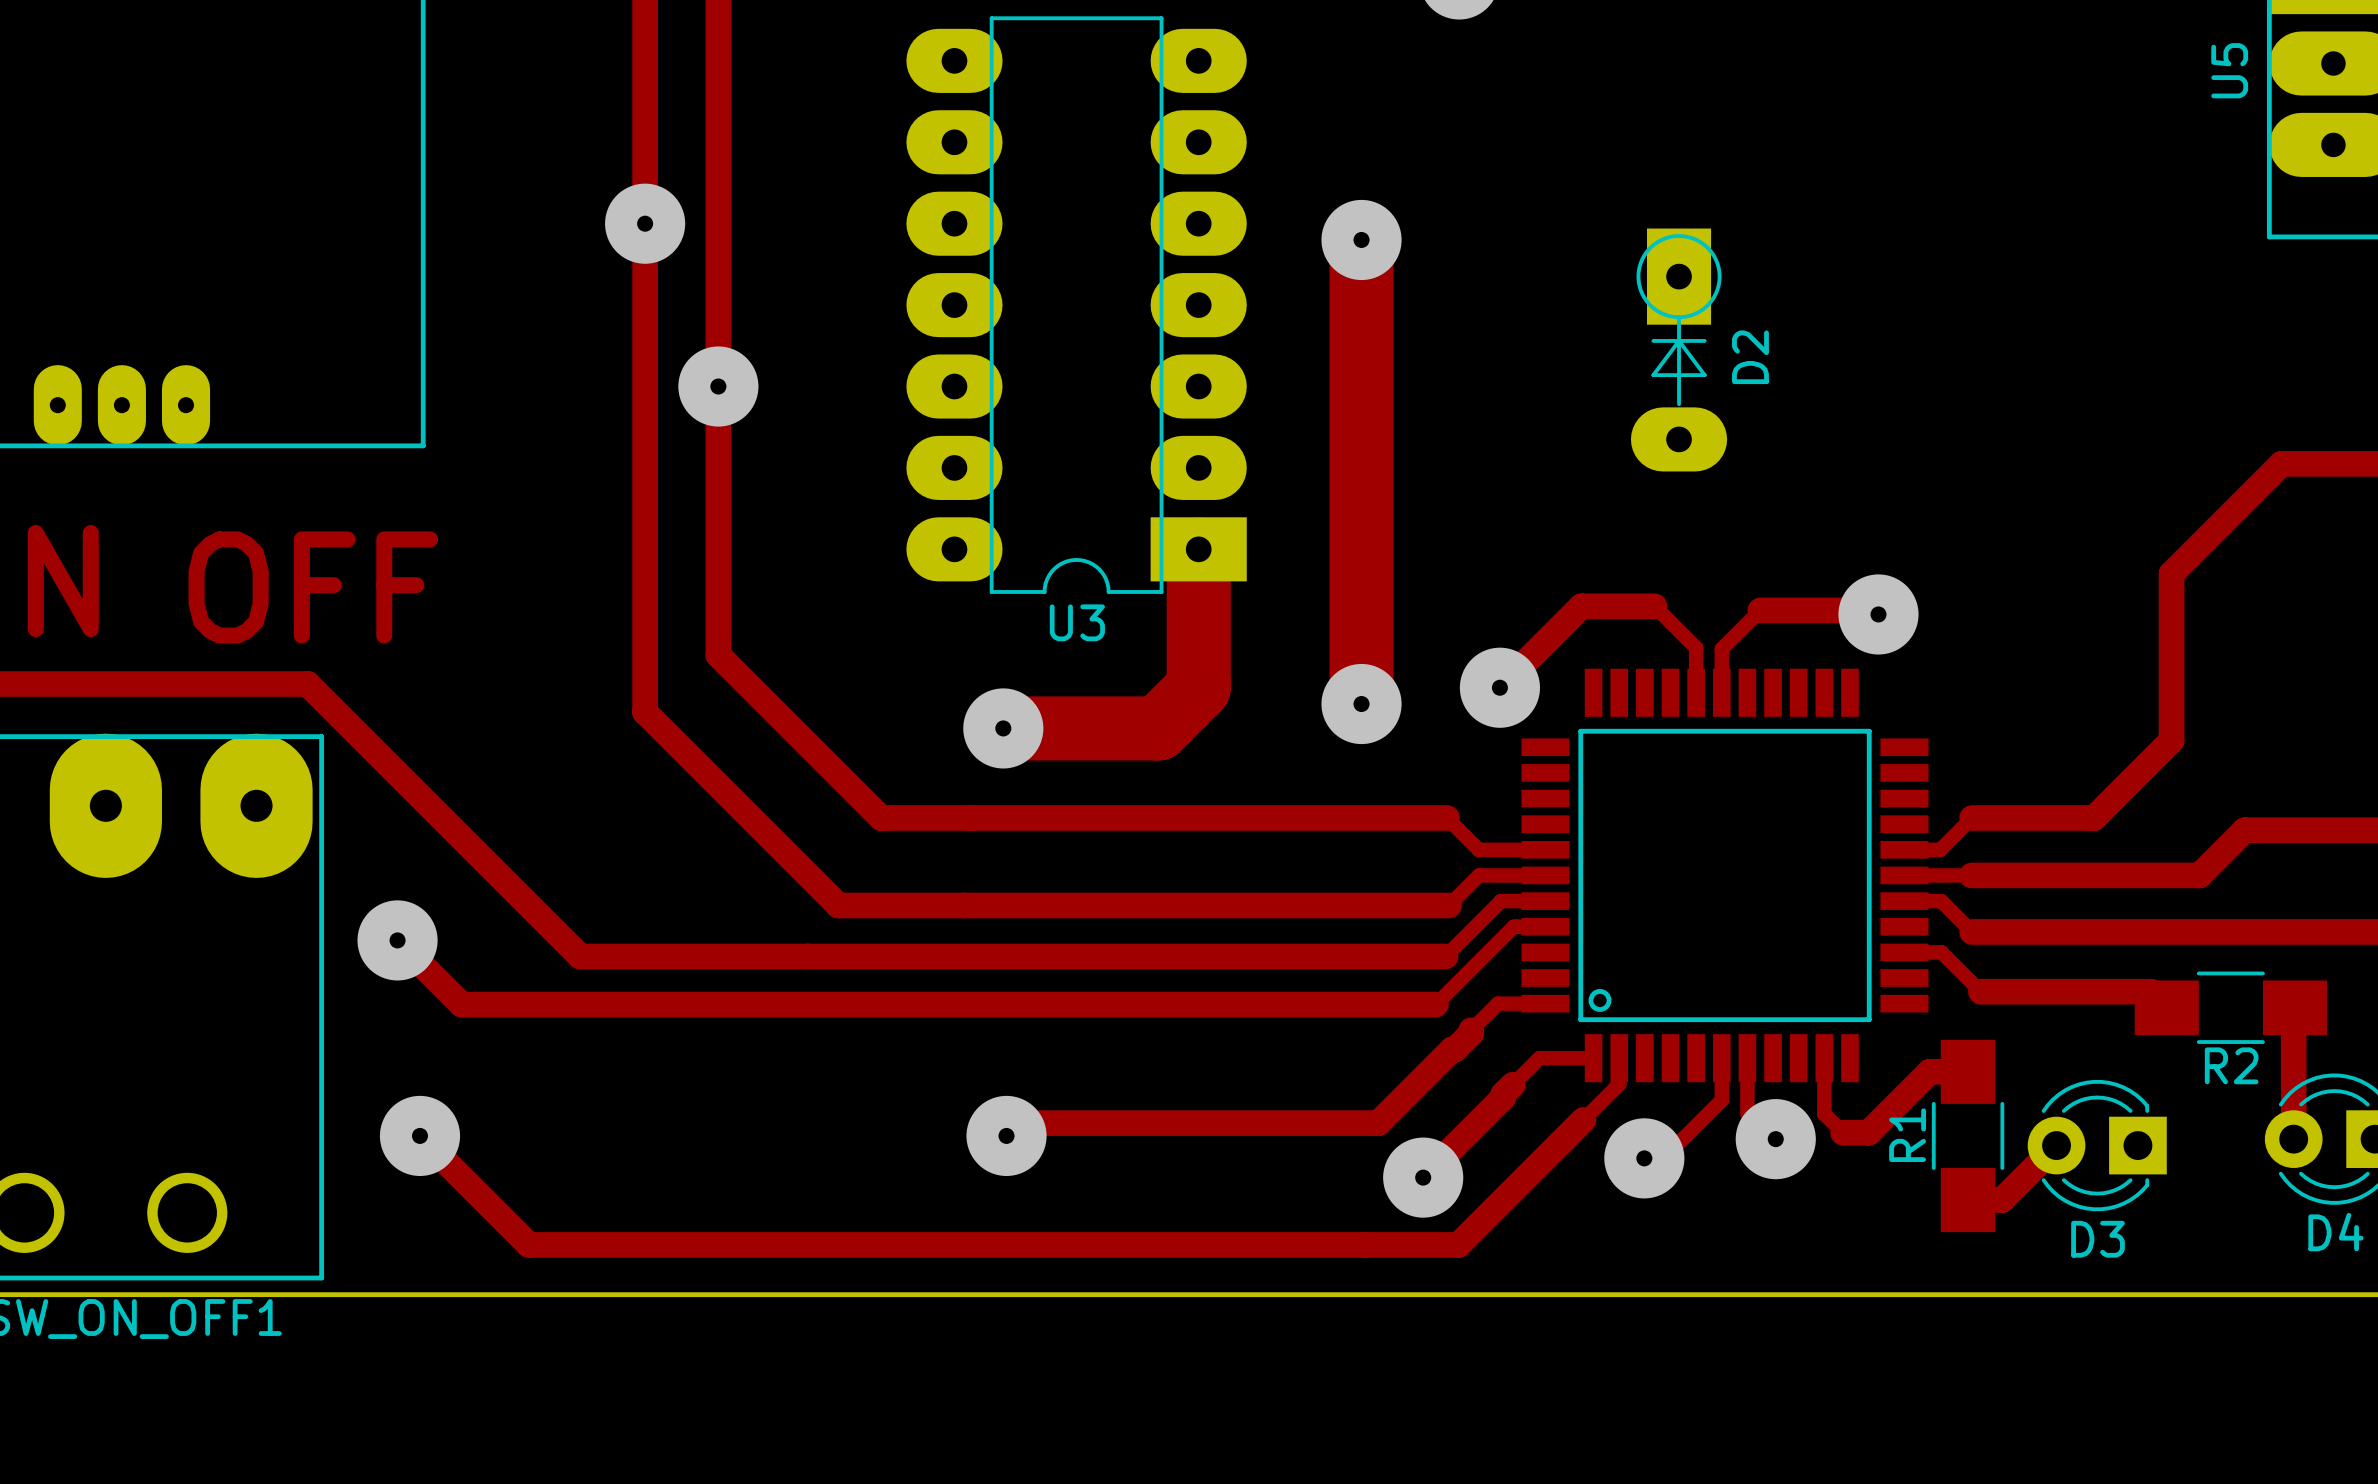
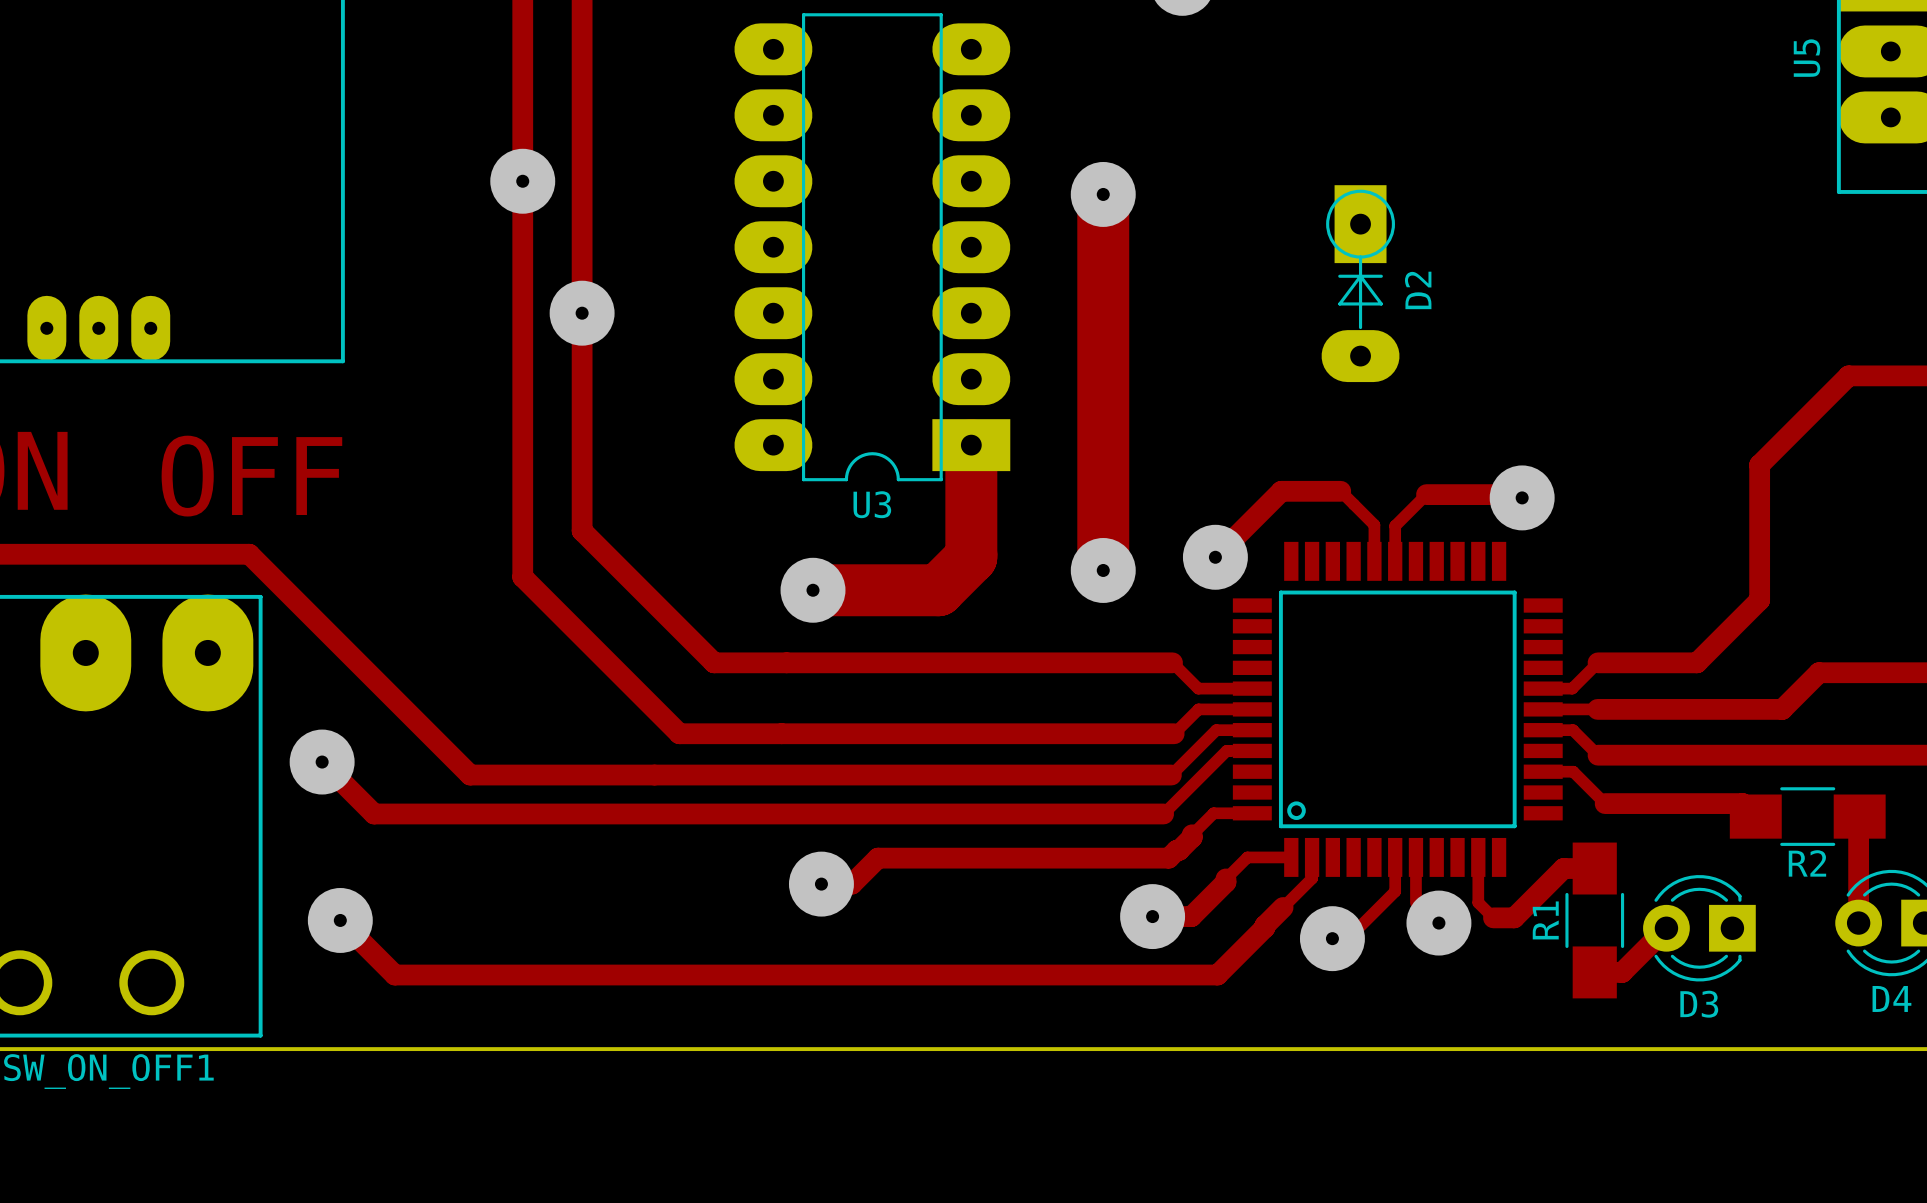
track: (1442, 1059) (1378, 1123) (1019, 1123) (1006, 1135) -> (1168, 858) (877, 858) (851, 884) (821, 884)
track: (1512, 1084) (1503, 1094) (1503, 1097) (1423, 1177) -> (1225, 878) (1225, 882) (1191, 916) (1152, 916)
via position: (1006, 1135) -> (821, 884)
track: (1561, 1142) (1458, 1244) (528, 1244) (487, 1203) -> (1264, 925) (1217, 975) (394, 975)
via position: (1423, 1177) -> (1152, 916)

